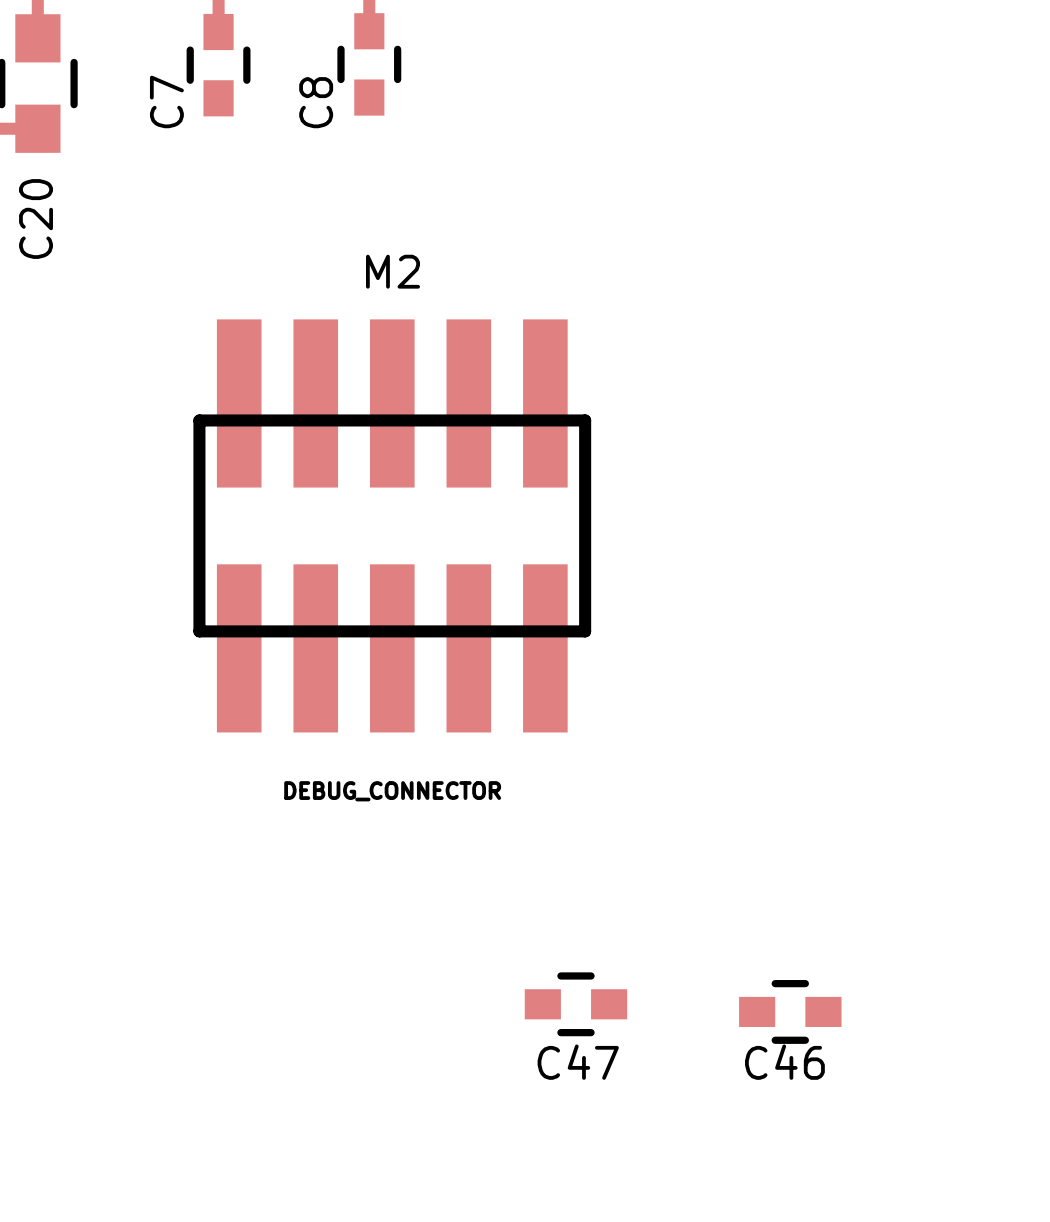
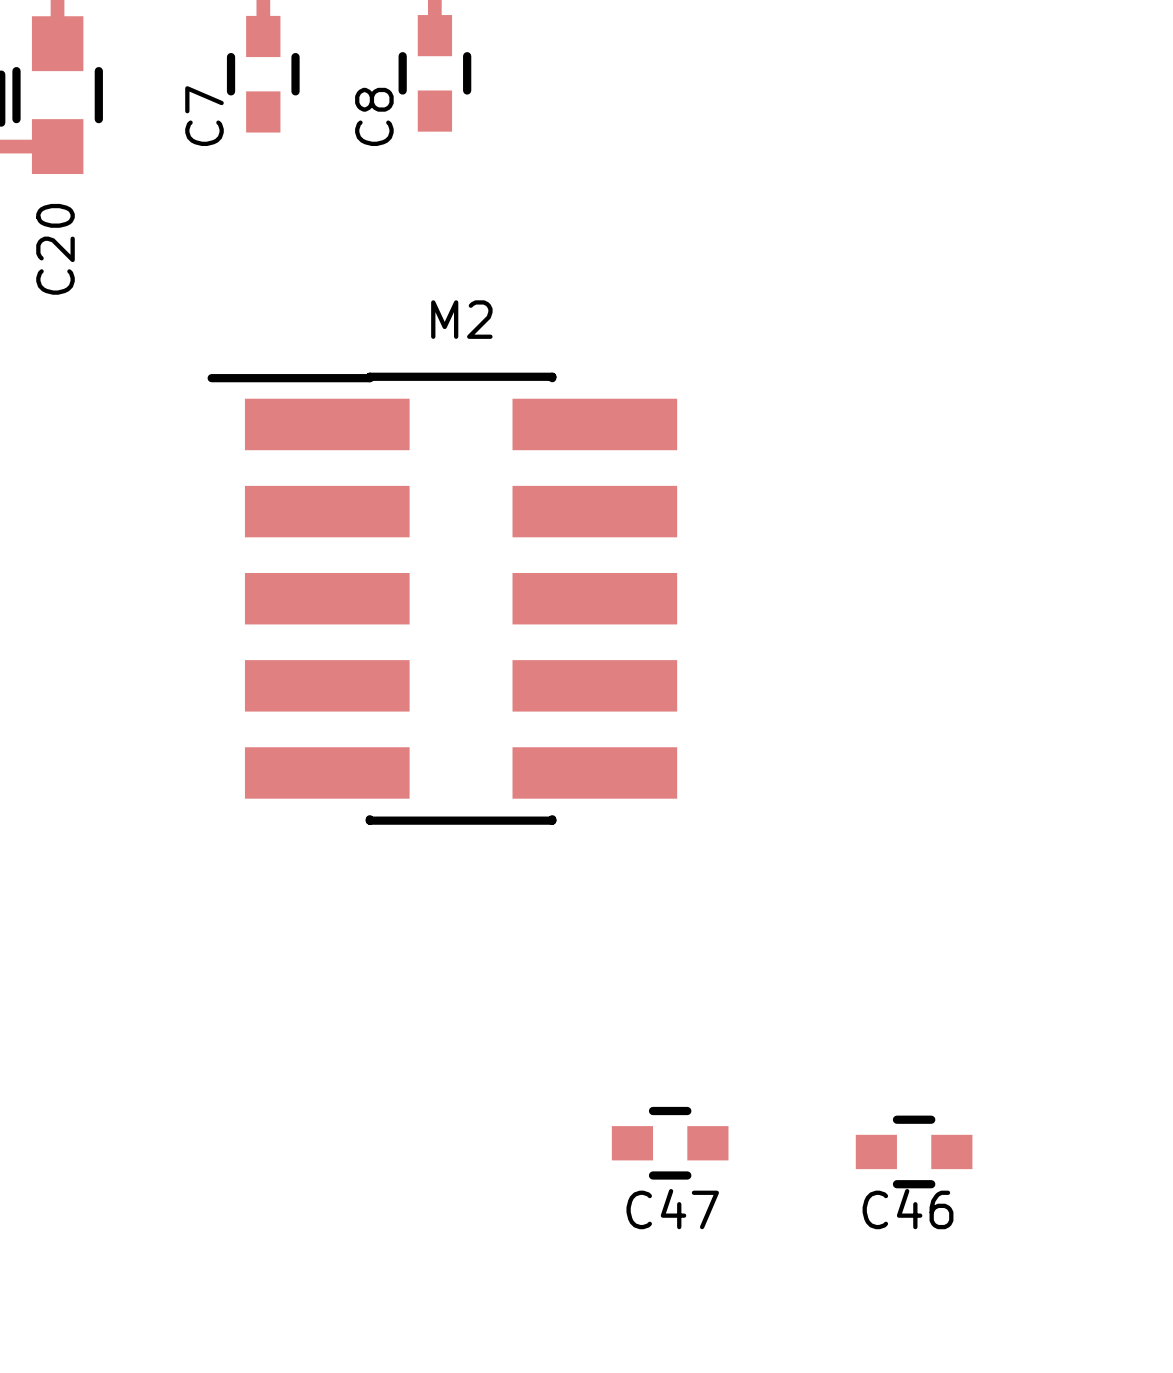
M2 footprint: [193, 319, 592, 733] -> [207, 372, 678, 825]
M2 value: DEBUG_CONNECTOR (392, 791) -> none

